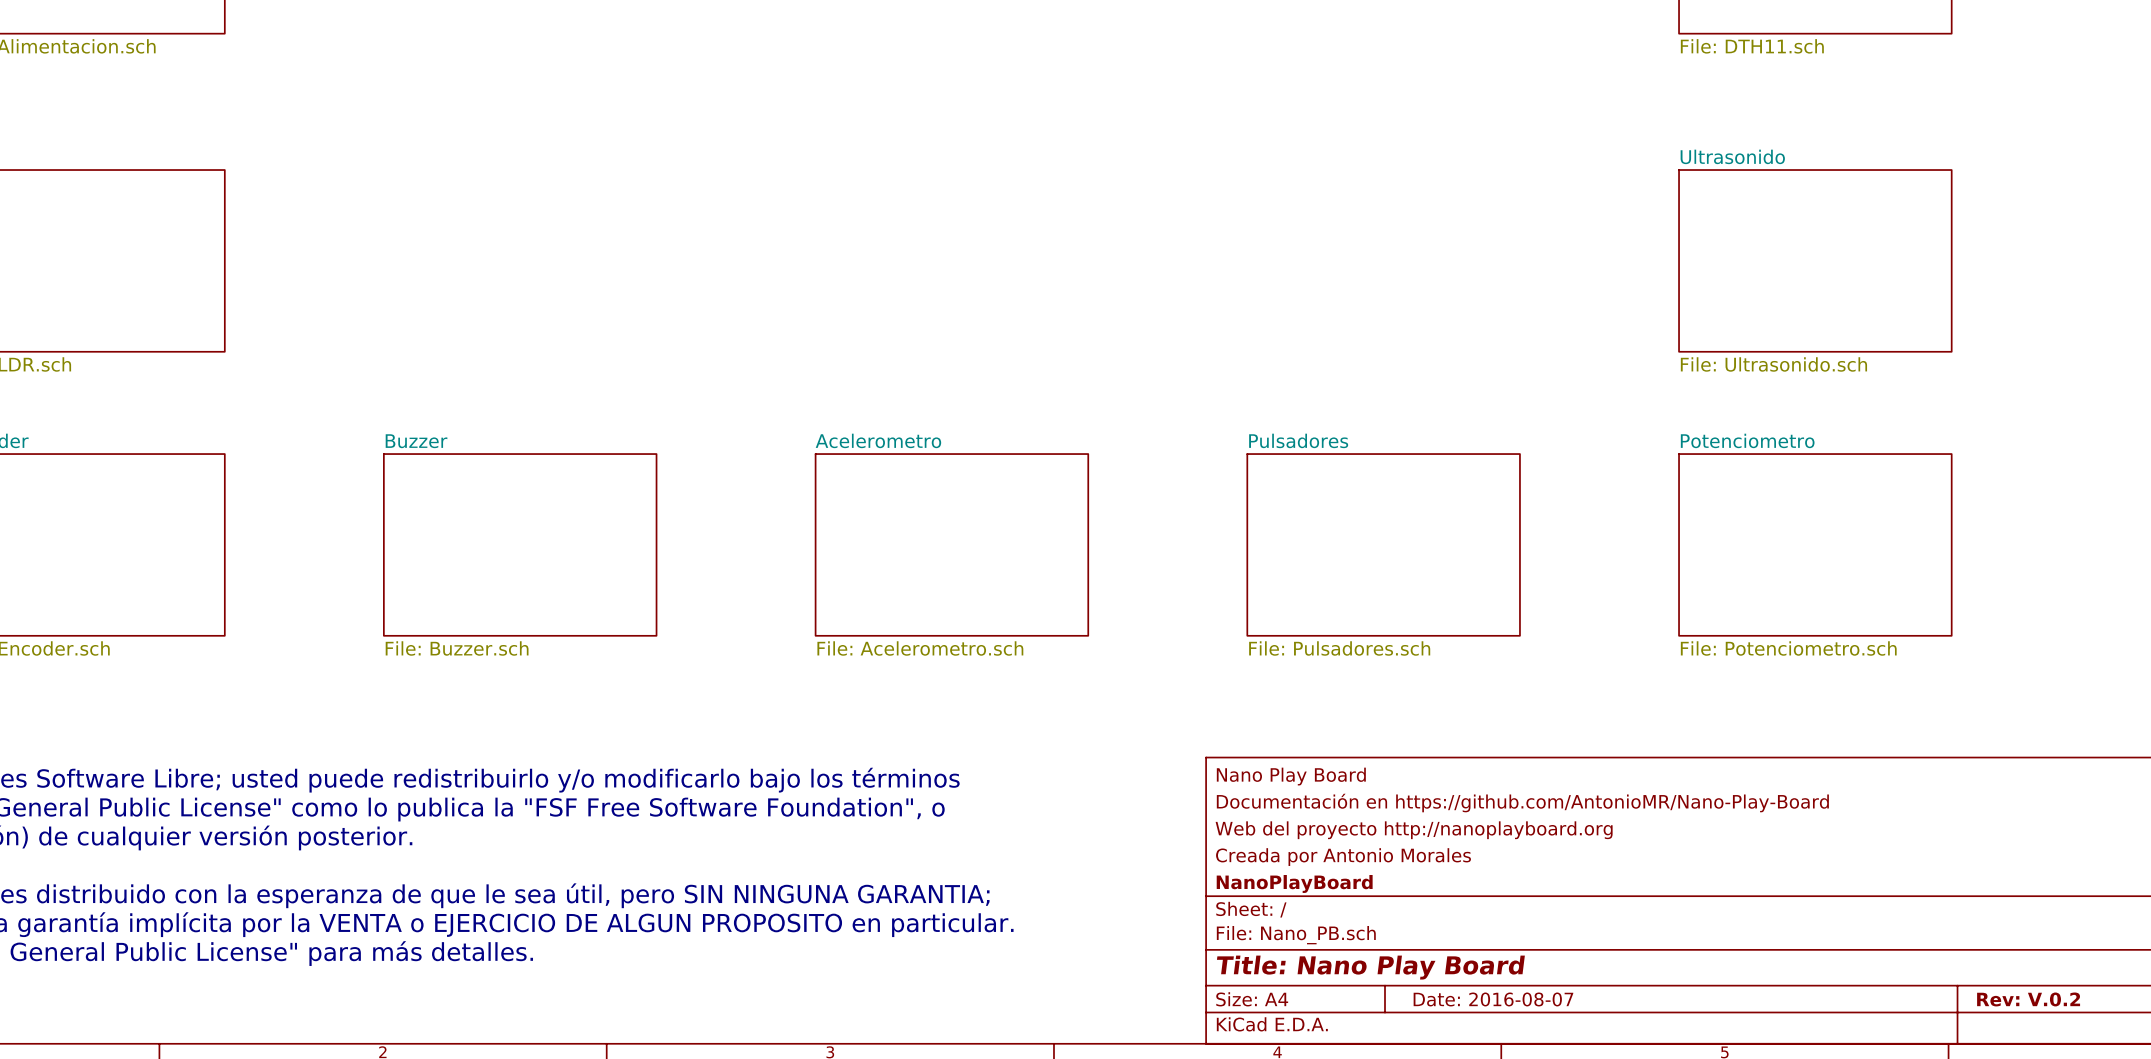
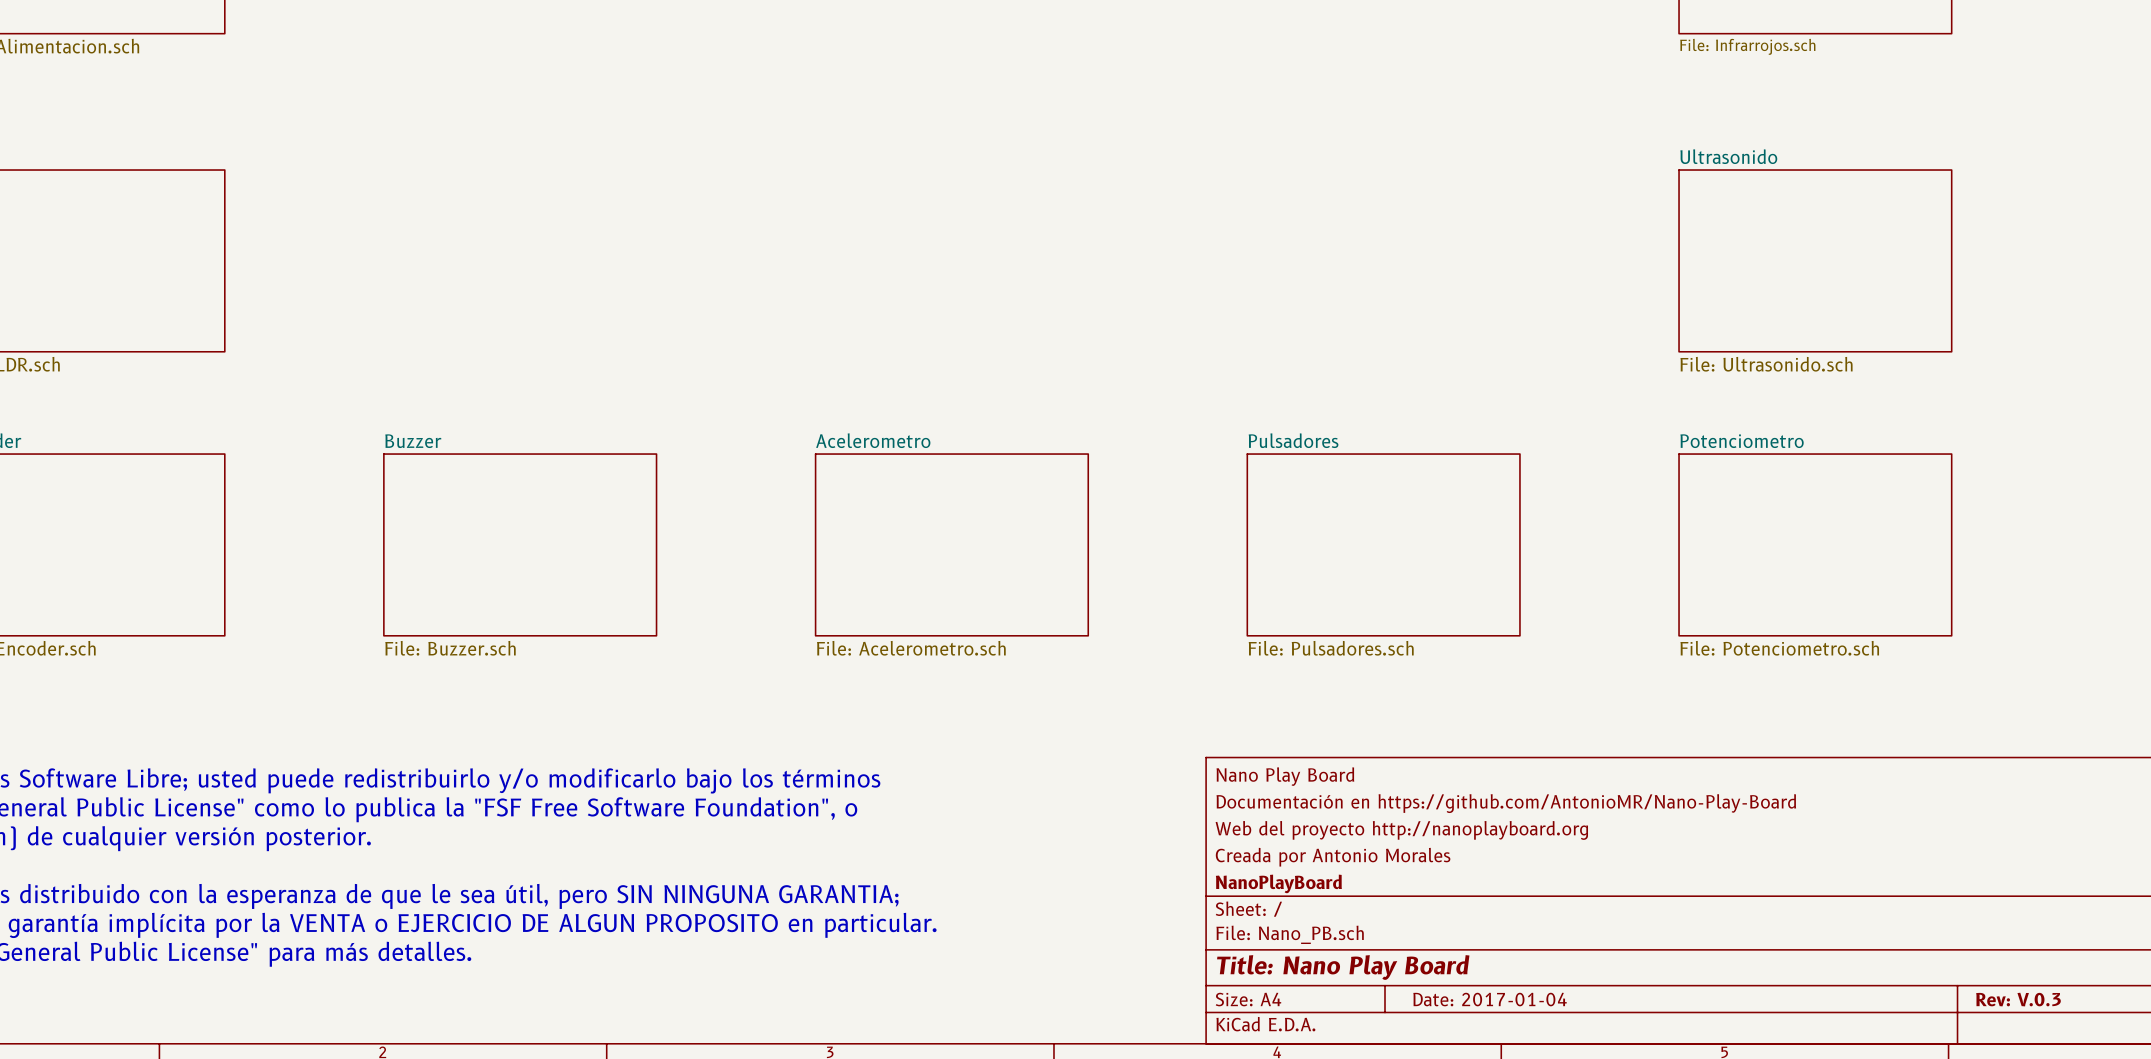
sheet value: File: DTH11.sch (1752, 46) -> File: Infrarrojos.sch (1747, 46)
title block: Date: 2016-08-07 (1493, 999) -> Date: 2017-01-04 (1490, 999)
title block: Rev: V.0.2 (2028, 999) -> Rev: V.0.3 (2018, 999)

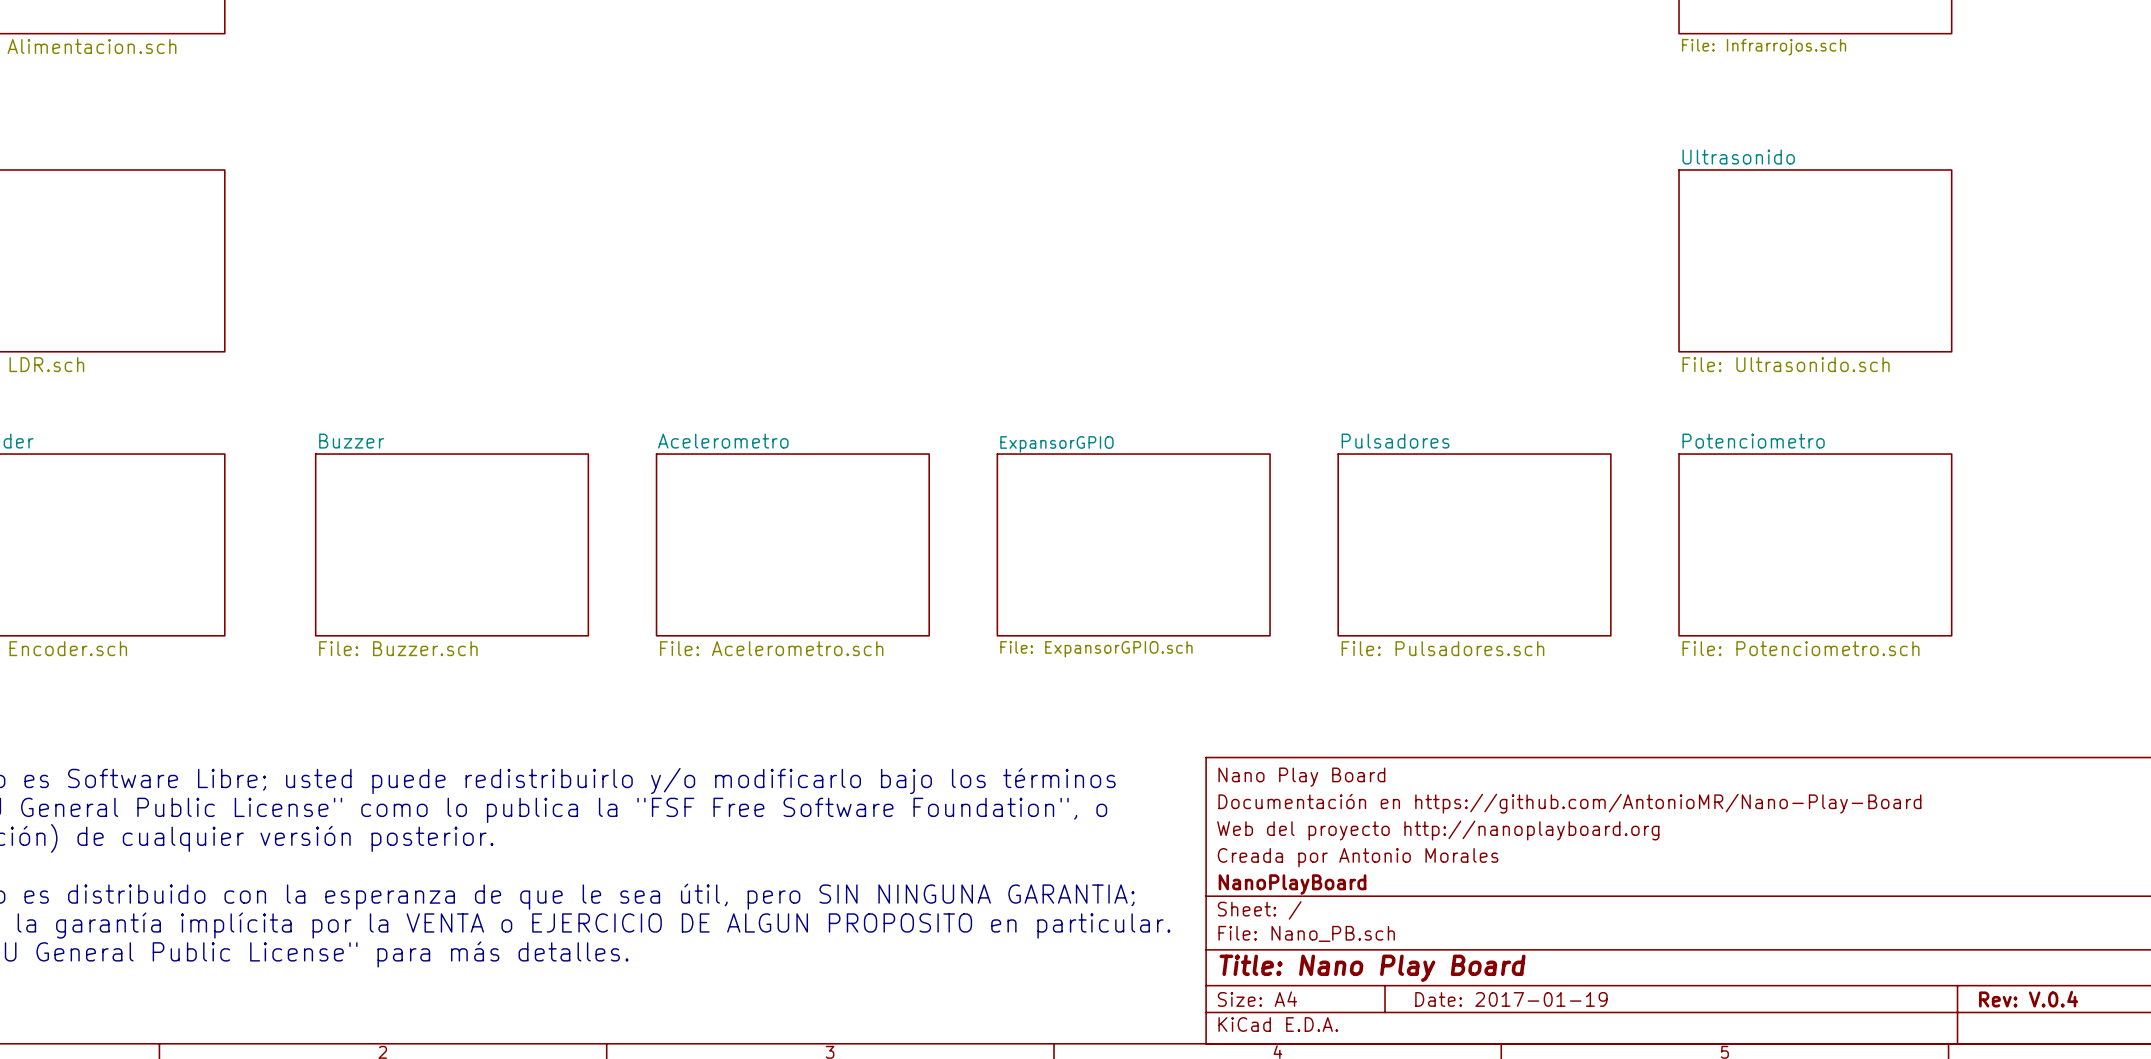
sheet Buzzer position: (520, 544) -> (452, 544)
sheet Acelerometro position: (951, 544) -> (792, 544)
sheet ExpansorGPIO: none -> File: ExpansorGPIO.sch (1133, 544)
sheet Pulsadores position: (1383, 544) -> (1474, 544)
title block: Date: 2017-01-04 (1490, 999) -> Date: 2017-01-19 (1511, 999)
title block: Rev: V.0.3 (2018, 999) -> Rev: V.0.4 (2028, 999)

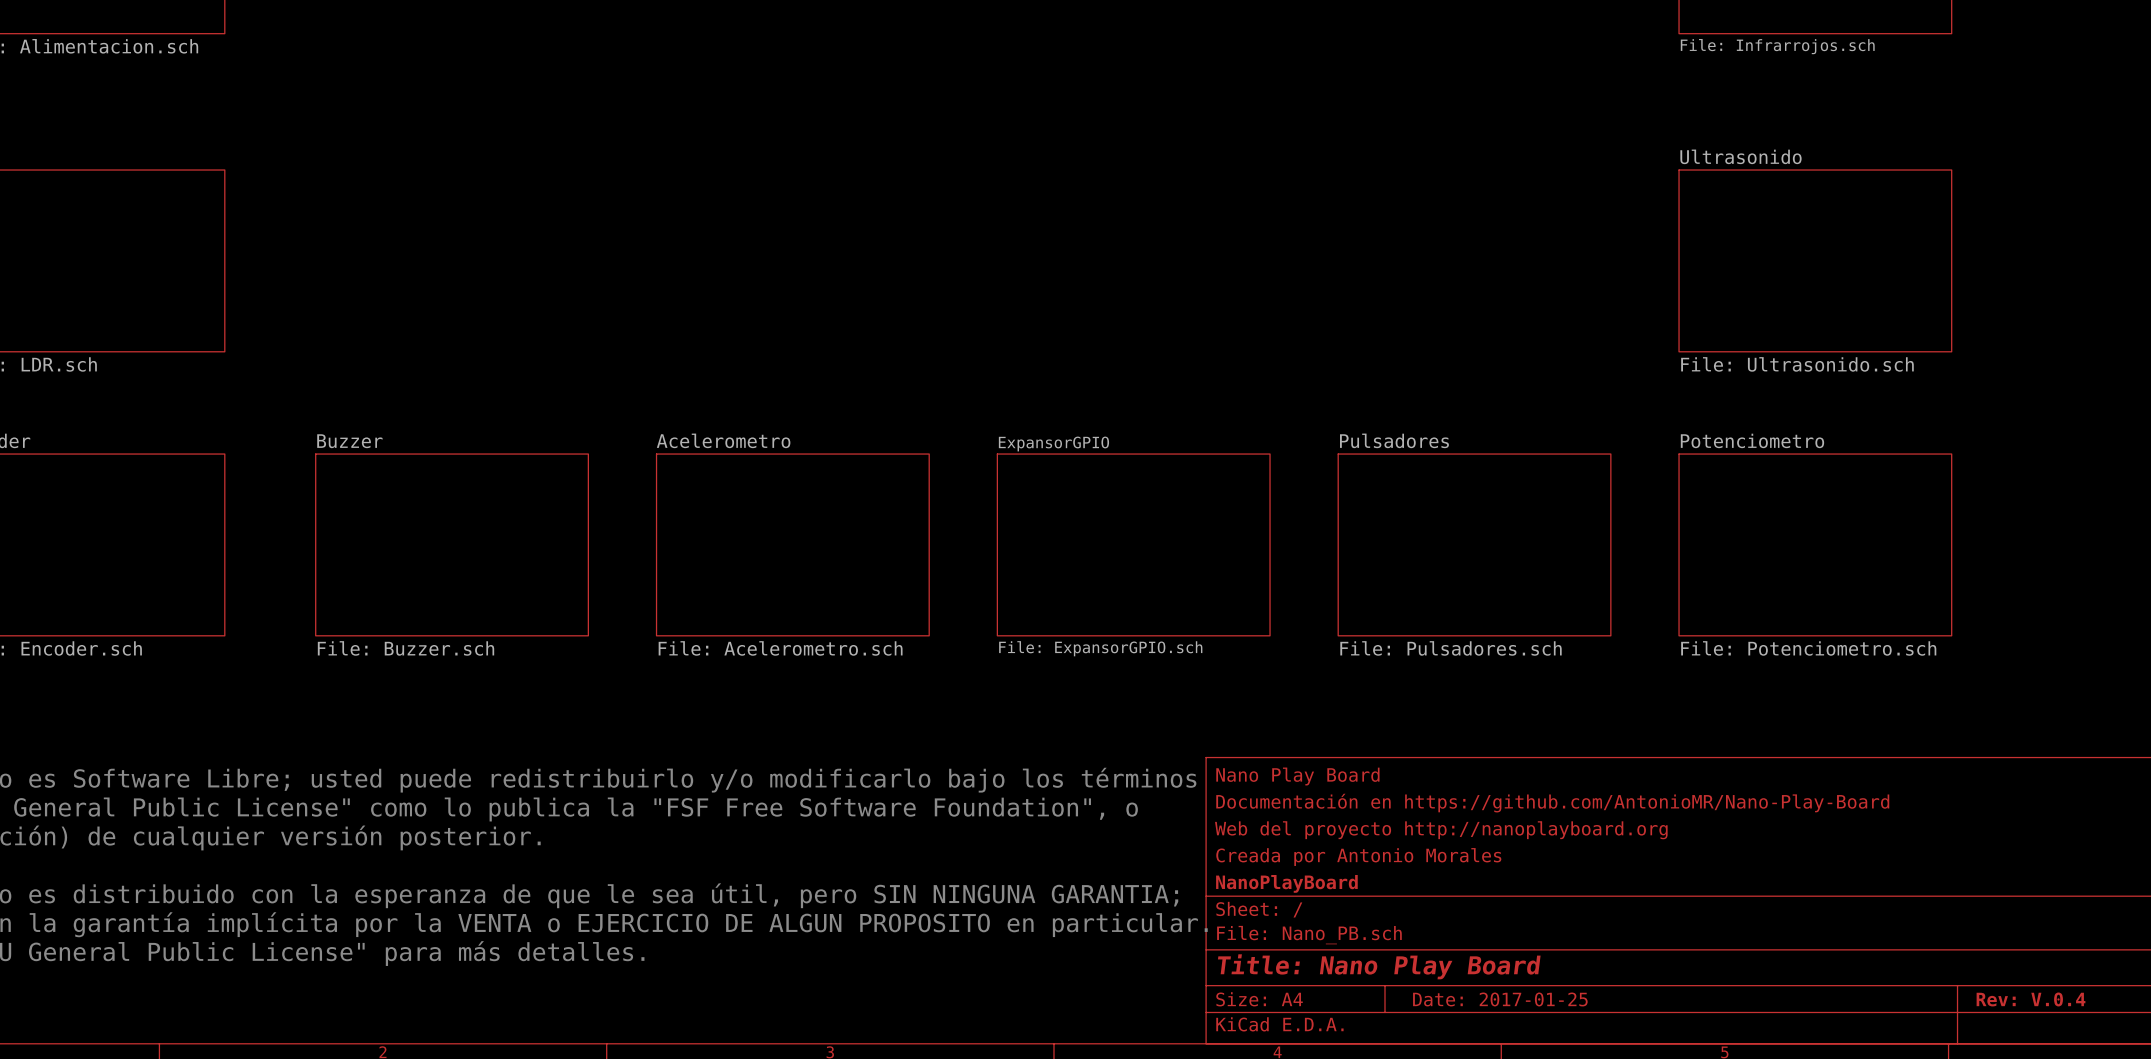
title block: Date: 2017-01-19 (1511, 999) -> Date: 2017-01-25 (1500, 999)

